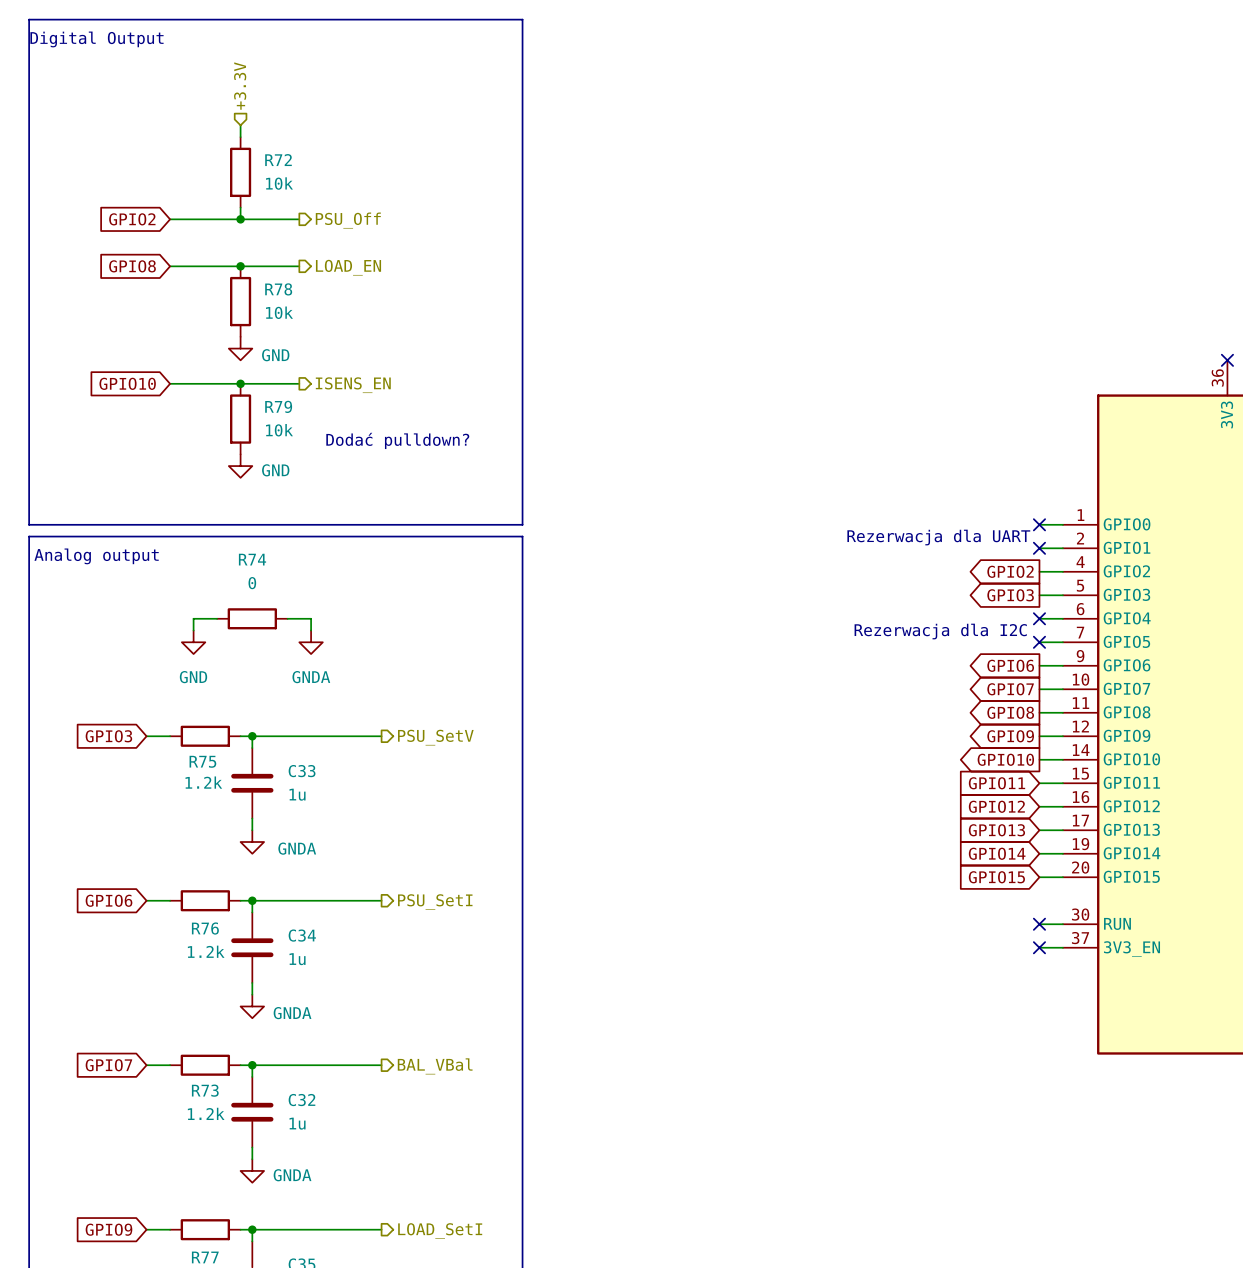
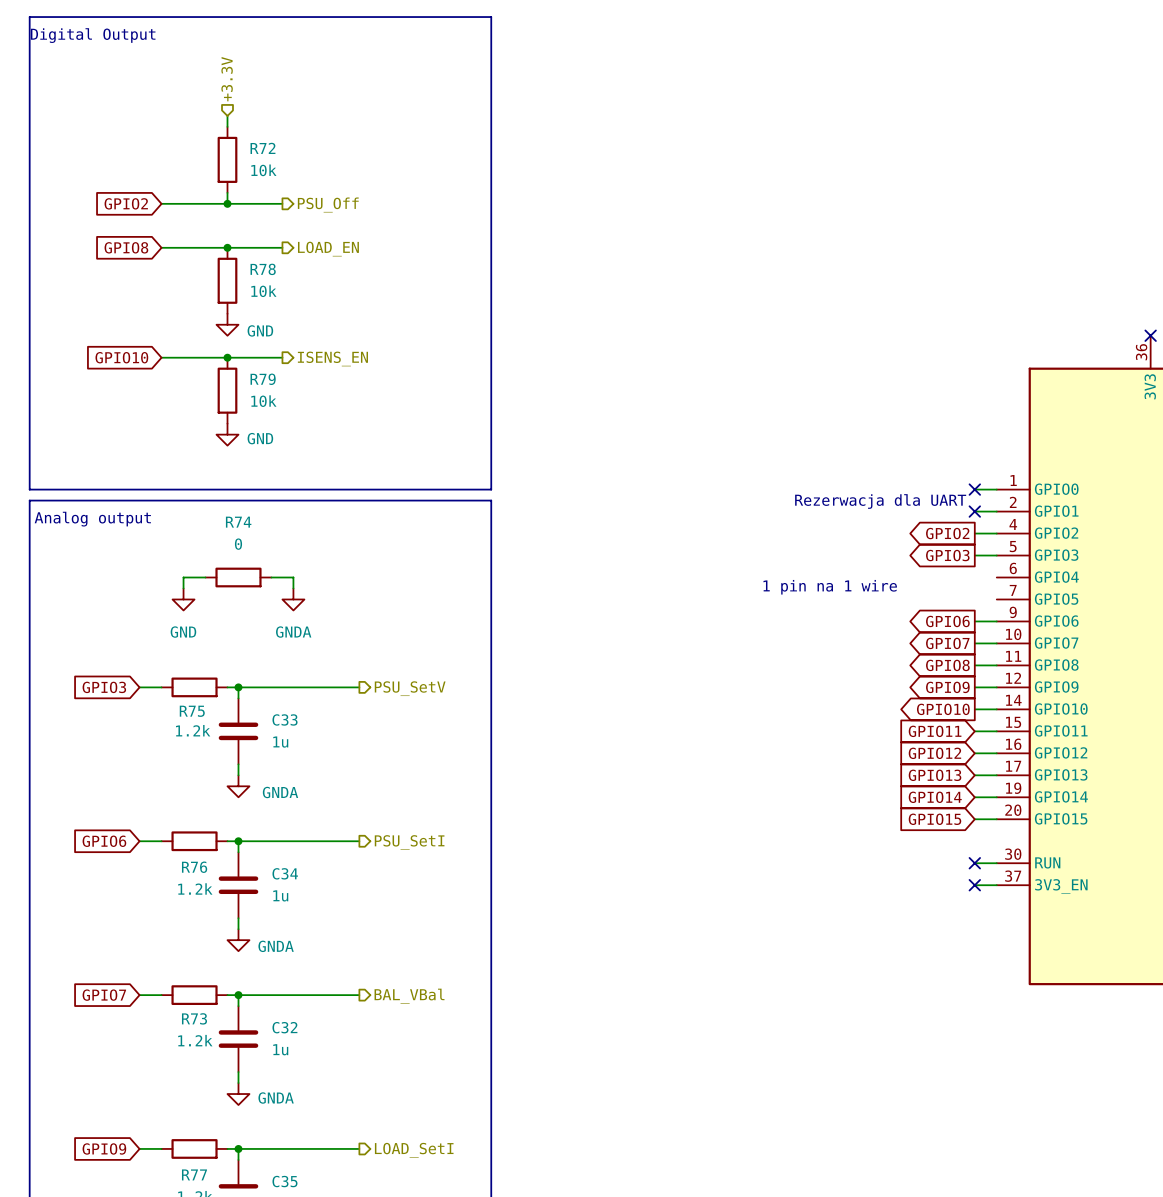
text: Dodać pulldown? (397, 440) -> none
wire: (1039, 618) (1062, 618) -> none
no-connect mark: (1039, 618) -> none
text: none -> 1 pin na 1 wire (830, 587)
text: Rezerwacja dla I2C (940, 631) -> none
wire: (1039, 642) (1062, 642) -> none
no-connect mark: (1039, 642) -> none

